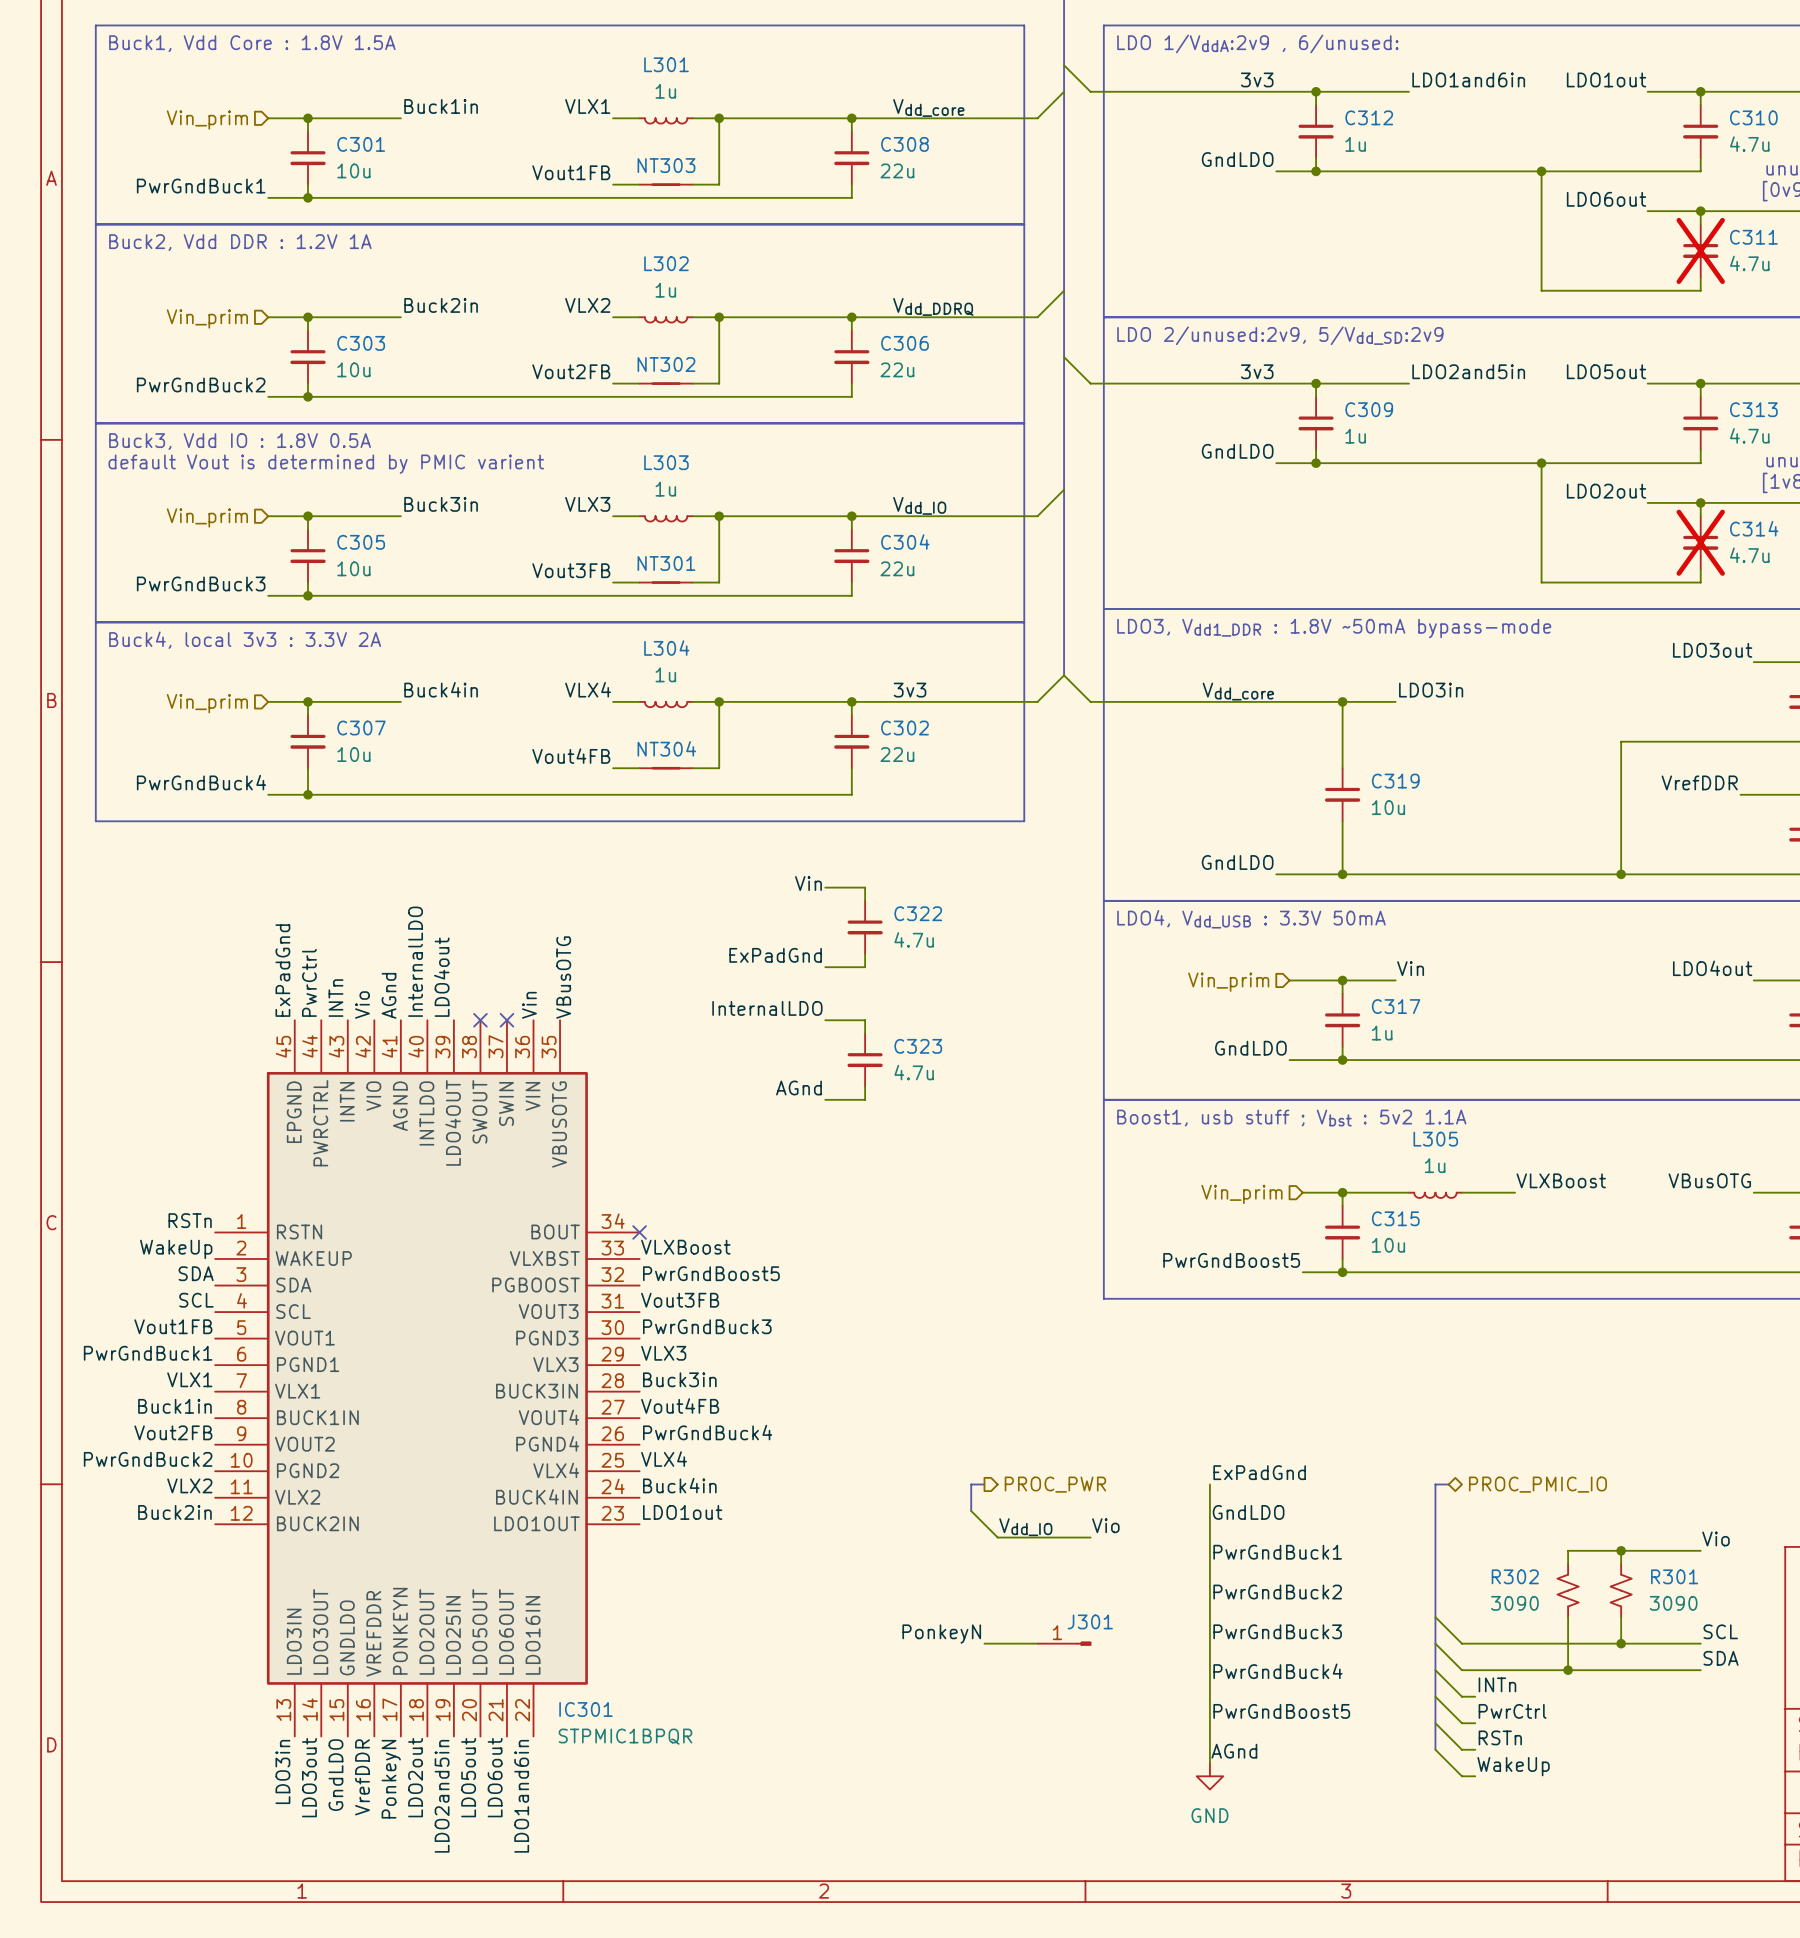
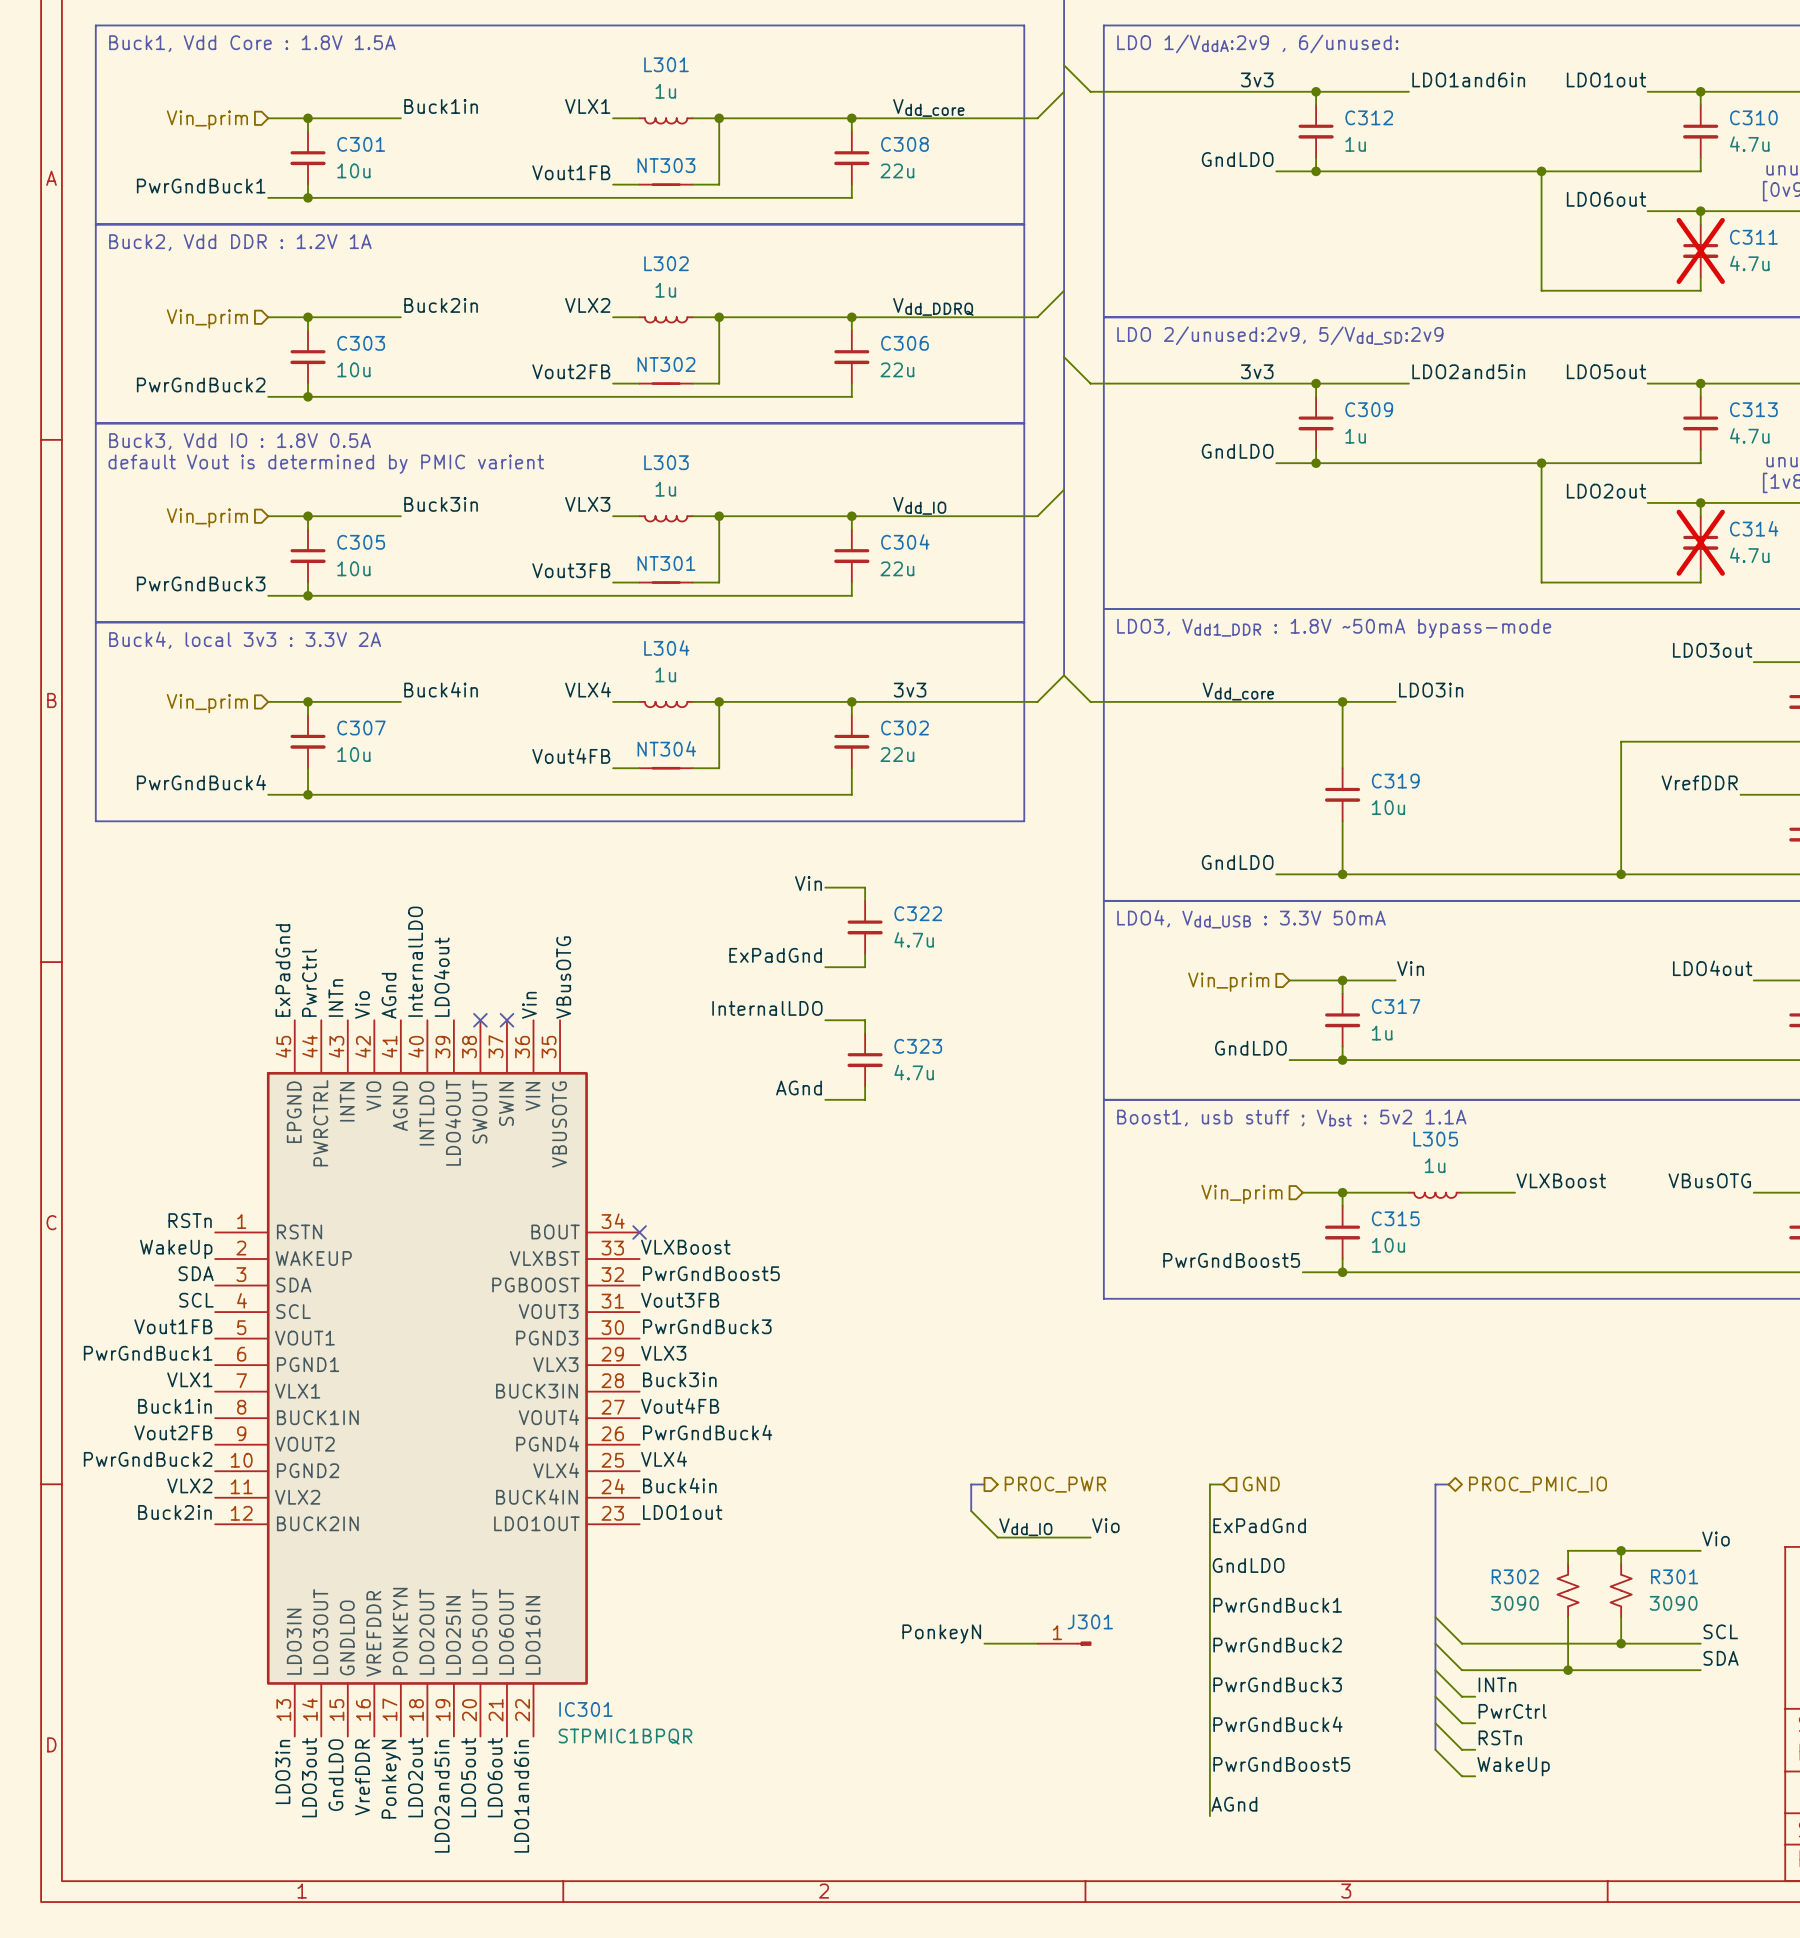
label position: ExPadGnd (1259, 1472) -> ExPadGnd (1259, 1525)
wire: none -> (1209, 1484) (1223, 1484)
hierarchical label: none -> GND (1261, 1484)
label position: GndLDO (1248, 1512) -> GndLDO (1248, 1565)
label position: PwrGndBuck1 (1277, 1552) -> PwrGndBuck1 (1277, 1605)
label position: PwrGndBuck2 (1277, 1592) -> PwrGndBuck2 (1277, 1645)
label position: PwrGndBuck3 (1277, 1631) -> PwrGndBuck3 (1277, 1684)
label position: PwrGndBuck4 (1277, 1671) -> PwrGndBuck4 (1277, 1724)
label position: PwrGndBoost5 (1281, 1711) -> PwrGndBoost5 (1281, 1764)
label position: AGnd (1234, 1751) -> AGnd (1234, 1804)
wire: none -> (1209, 1763) (1209, 1816)
power symbol: GND (1209, 1776) -> none

